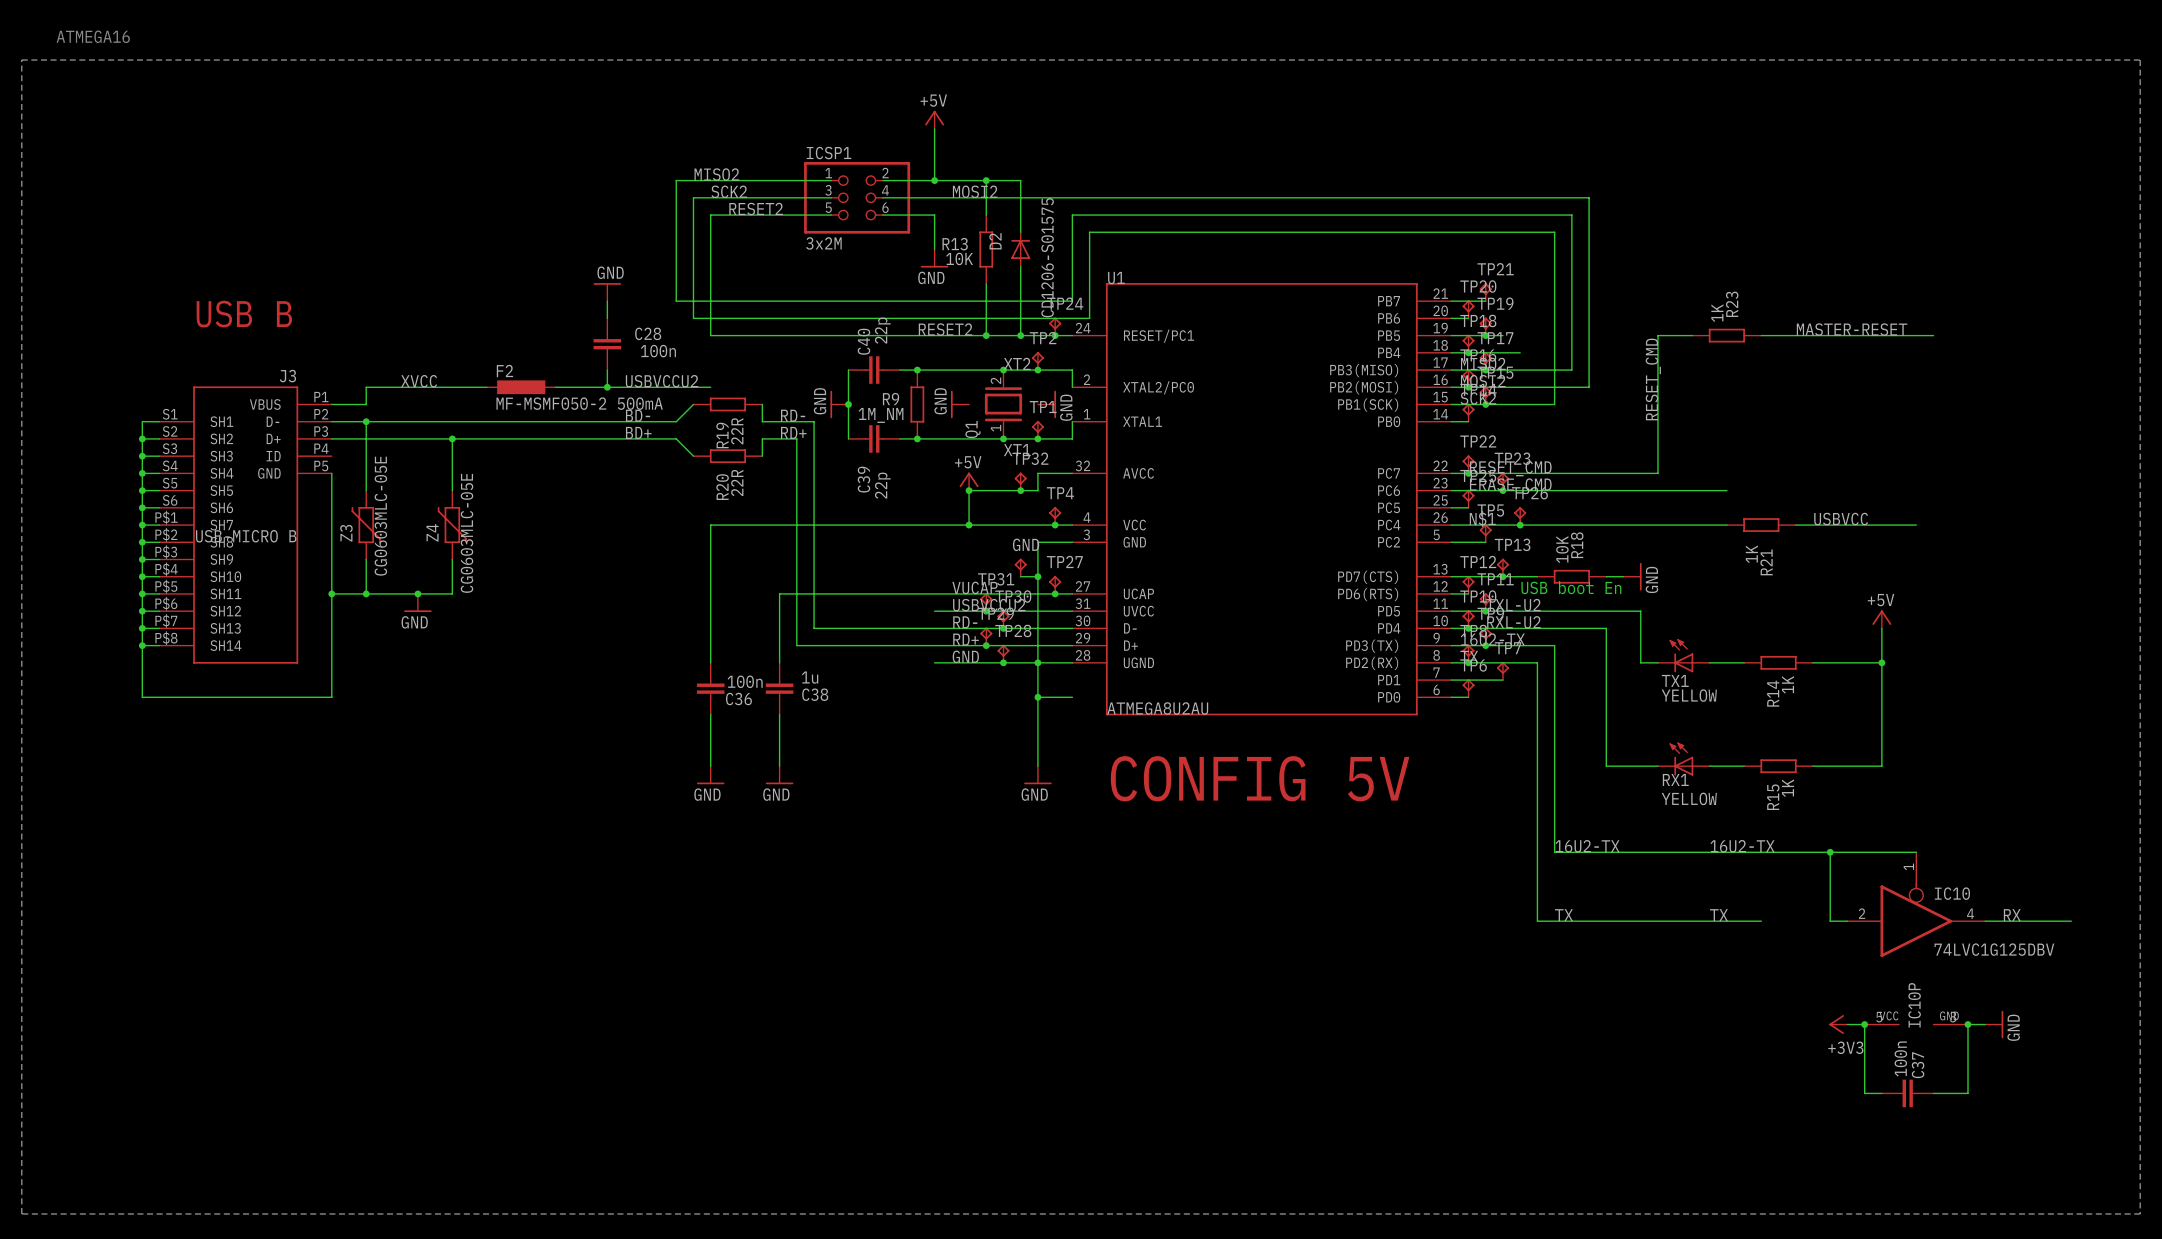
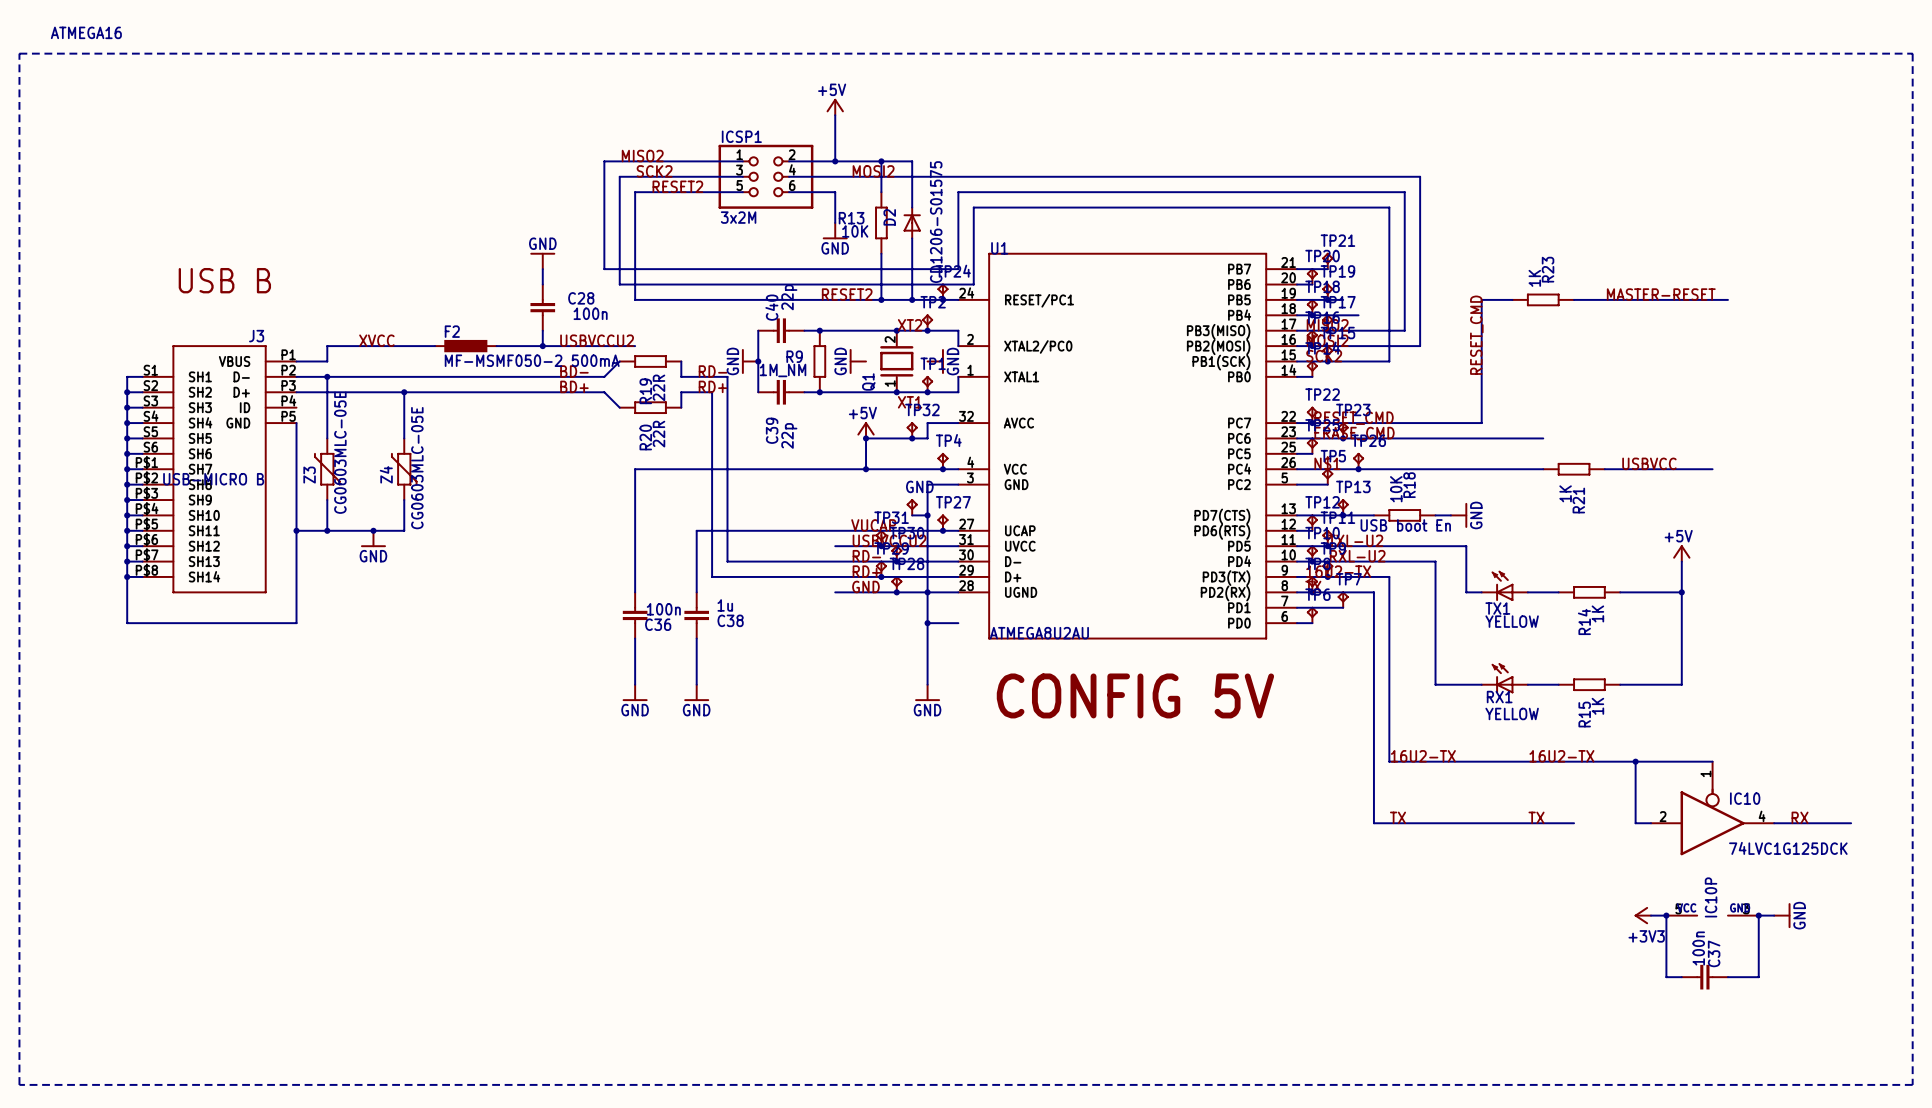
IC10 value: 74LVC1G125DBV (1994, 949) -> 74LVC1G125DCK (1788, 848)

